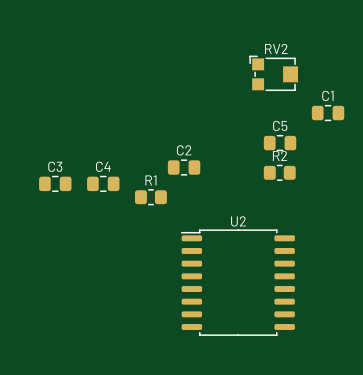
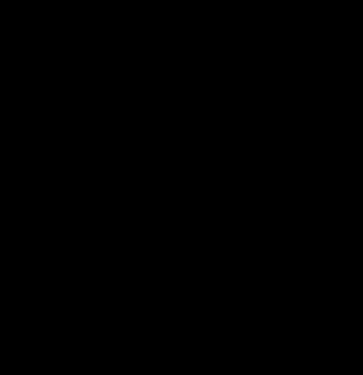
RV2: (273, 73) -> none
C1: (328, 113) -> none
C5: (280, 143) -> none
C2: (184, 167) -> none
R2: (279, 172) -> none
C3: (55, 183) -> none
C4: (103, 183) -> none
R1: (150, 197) -> none
U2: (237, 282) -> none

